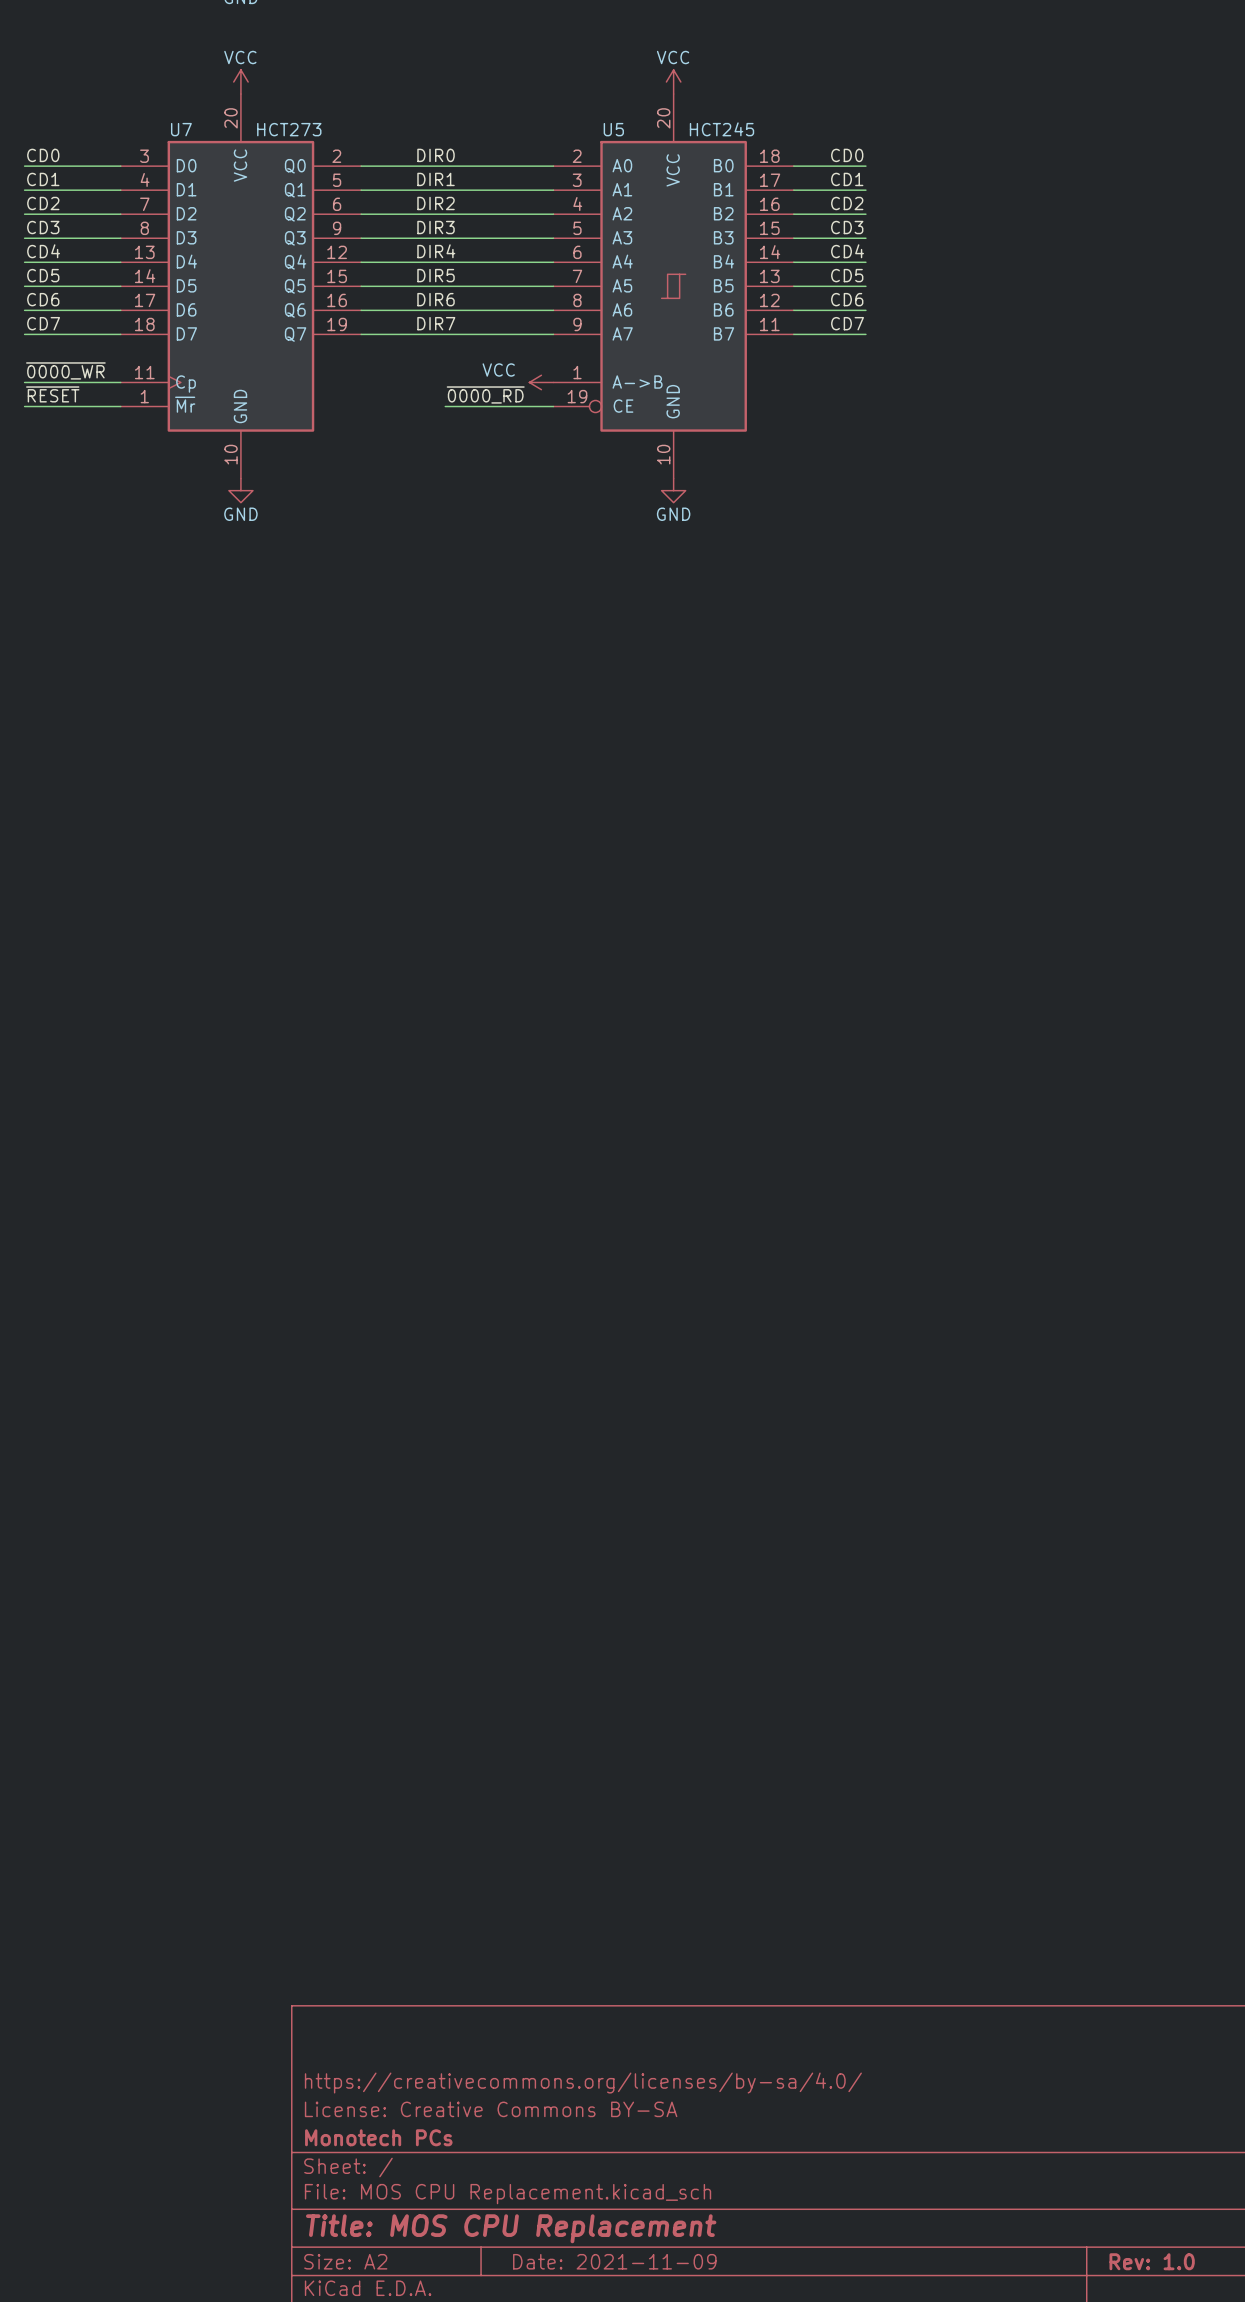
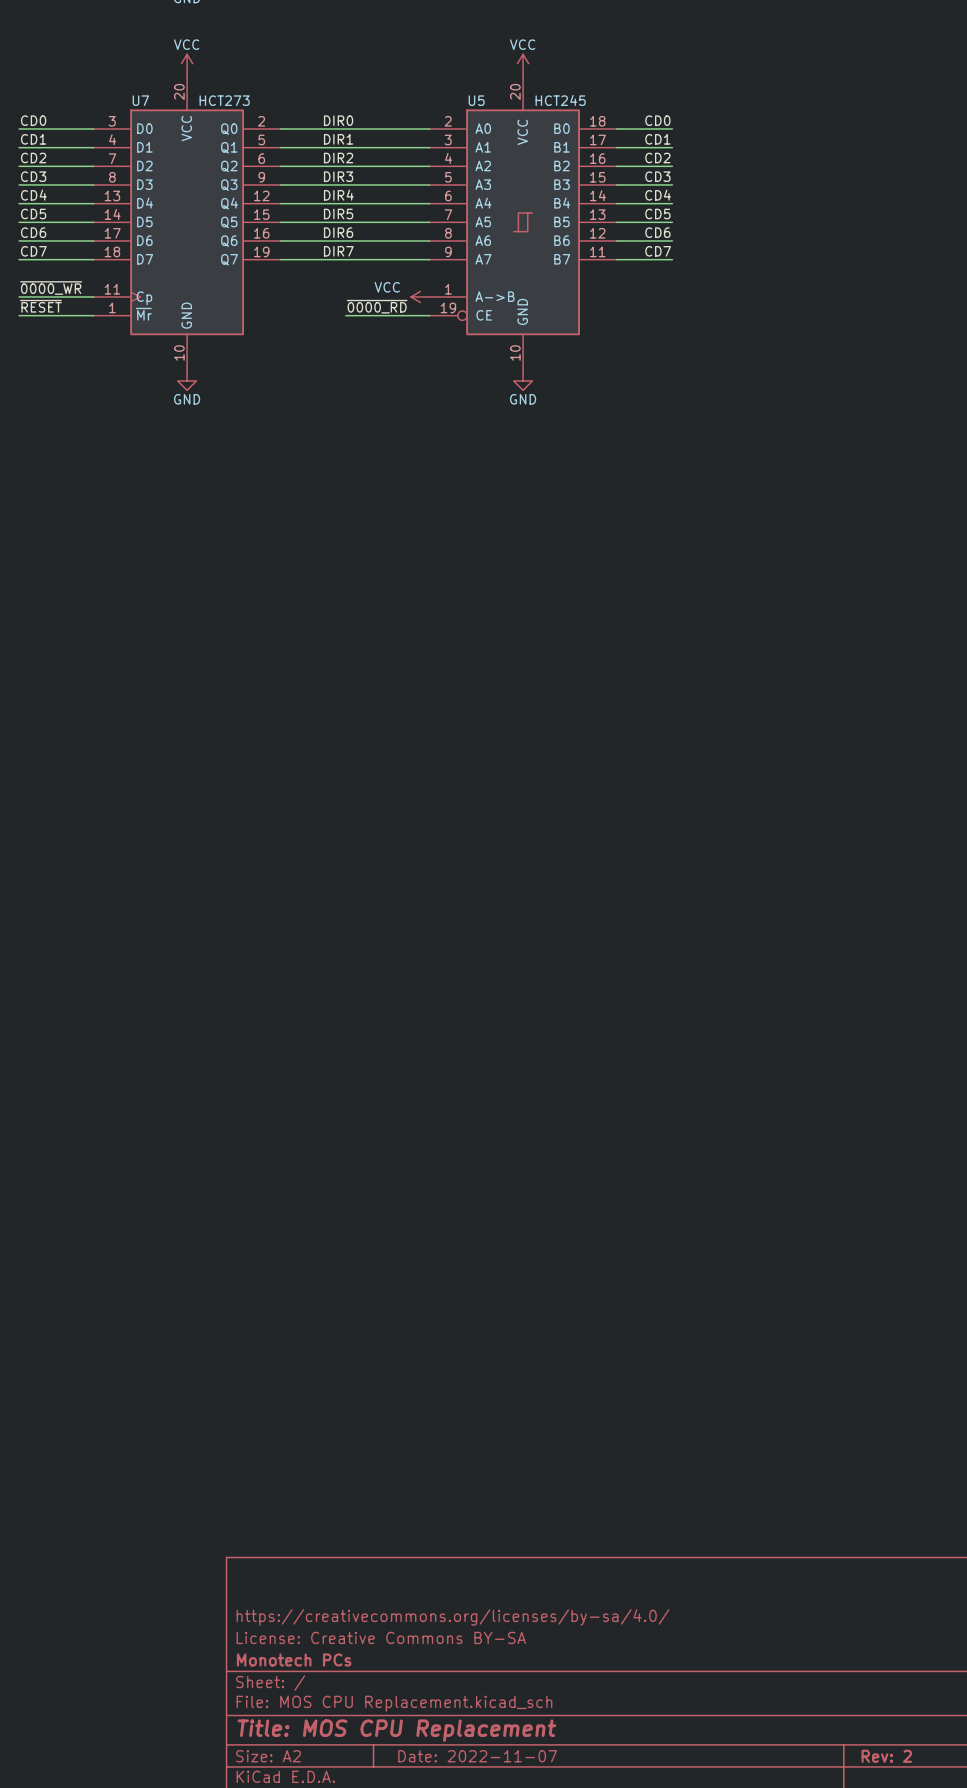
title block: Date: 2021-11-09 (614, 2261) -> Date: 2022-11-07 (477, 1756)
title block: Rev: 1.0 (1152, 2261) -> Rev: 2 (886, 1756)

